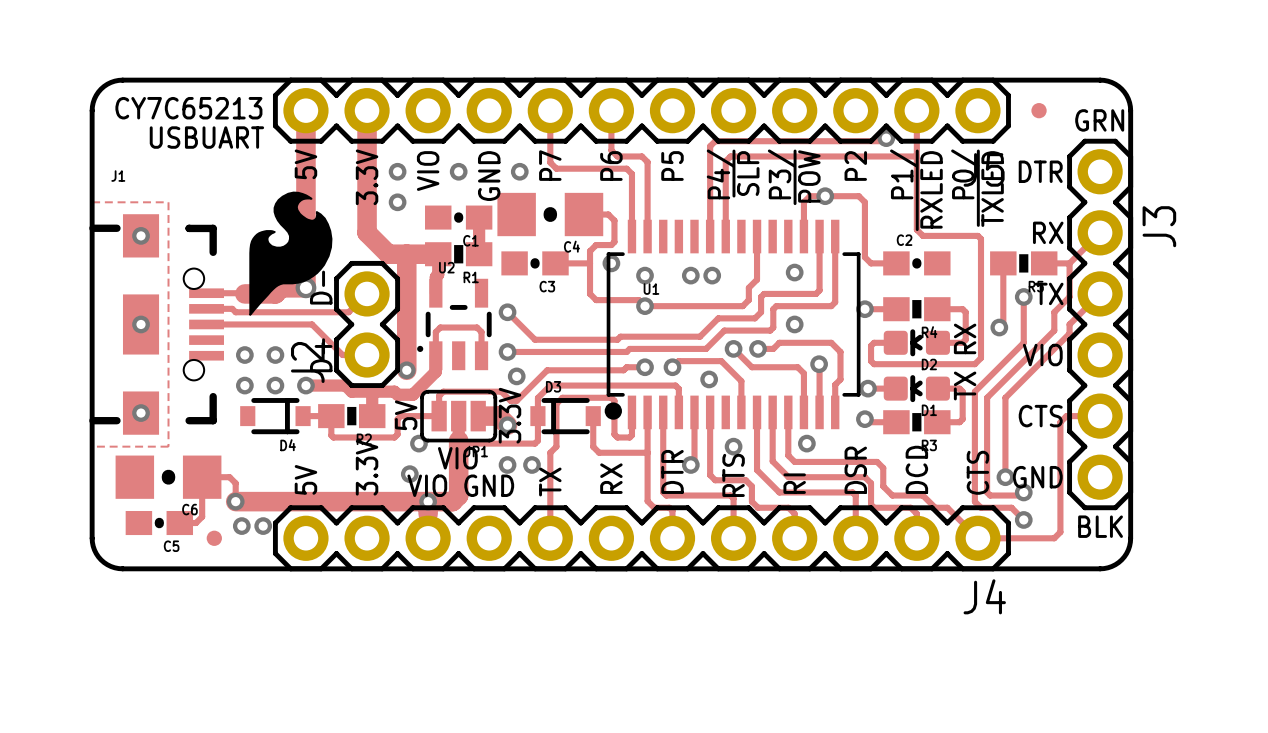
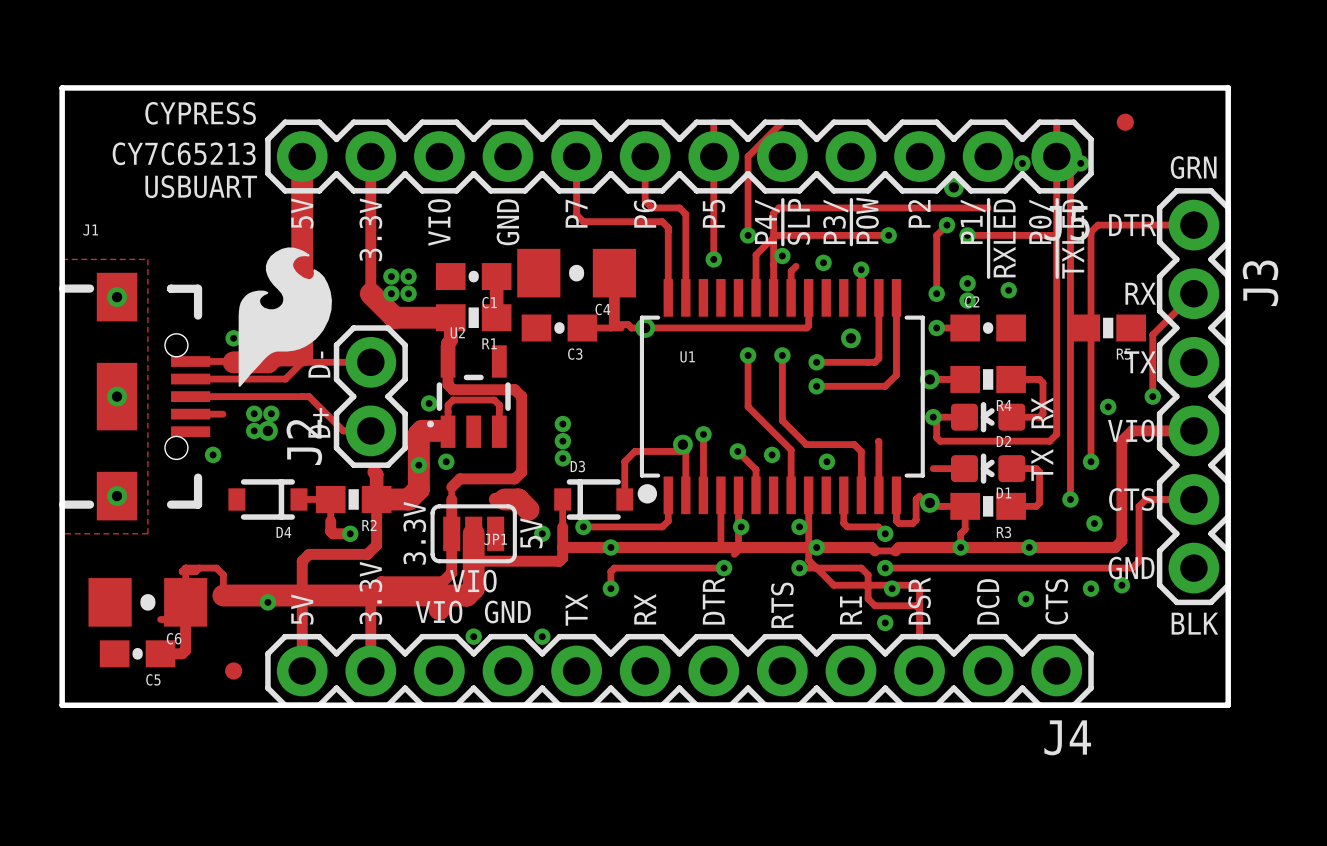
text: none -> CYPRESS (200, 113)
track: none -> (713, 122) (713, 259)
track: none -> (782, 122) (748, 156) (748, 235)
board edge: (92, 110) (94, 98) (101, 89) (111, 82) (122, 80) (1100, 80) (1111, 82) (1121, 89) (1128, 98) (1130, 110) -> (62, 156) (62, 87) (1228, 87) (1228, 156)
track width: thick (367, 110) (367, 232) -> thin (370, 156) (370, 293)
track: (916, 110) (916, 229) (922, 235) (977, 235) (981, 238) (981, 358) (974, 364) (971, 364) -> (1056, 122) (1056, 434) (1049, 441)
part position: (1039, 110) -> (1125, 122)
via: none -> (1022, 163)
track: none -> (1080, 163) (1070, 173) (1070, 499)
via: none -> (1080, 163)
track: (886, 138) (883, 141) (715, 141) (710, 146) (710, 198) -> (888, 235) (775, 235) (756, 254)
via: (397, 171) -> none
via: (458, 171) -> none
via: (519, 171) -> none
track: none -> (946, 225) (936, 235) (936, 293)
via: none -> (946, 225)
track: none -> (1193, 225) (1097, 225) (1091, 231) (1091, 461)
via: none -> (748, 235)
track: none -> (967, 235) (1056, 235)
via: none -> (967, 235)
via position: (825, 196) -> (888, 235)
via: none -> (782, 255)
via: (397, 202) -> none
via: none -> (713, 259)
via: none -> (823, 262)
track: none -> (796, 266) (791, 271) (791, 297)
track: (803, 208) (803, 202) (809, 196) (858, 196) (864, 202) (864, 257) (871, 263) -> none
via: none -> (861, 269)
track: (583, 214) (608, 214) (614, 220) (614, 242) (611, 245) (596, 245) (590, 251) (590, 293) (596, 300) (638, 300) (645, 306) (742, 306) (748, 300) (748, 287) (757, 279) (757, 261) -> (614, 273) (614, 324) (628, 324) (631, 328) (806, 328) (808, 325)
via: none -> (391, 276)
via: none -> (408, 276)
via: none -> (967, 283)
via: none -> (1008, 290)
via: none -> (391, 293)
via: none -> (408, 293)
via: none -> (936, 293)
via: none -> (967, 300)
track: (406, 254) (406, 370) -> none
via: none -> (936, 328)
track: (1003, 263) (1003, 323) (999, 327) -> none
track: (1044, 263) (1069, 263) (1069, 296) (1054, 312) (1054, 330) (987, 397) (987, 492) (990, 495) (1020, 495) (1023, 492) -> none
track: none -> (1159, 328) (1152, 334) (1152, 396)
via: none -> (233, 338)
via: (645, 275) -> none
via: (690, 275) -> none
via: (712, 275) -> none
via: (305, 287) -> none
via: none -> (748, 355)
via: none -> (782, 355)
track: (367, 293) (348, 312) (235, 312) (232, 308) -> (370, 362) (302, 362) (285, 379) (219, 379)
track: (764, 293) (761, 296) (761, 312) (754, 318) (718, 318) (699, 336) (620, 336) (617, 339) (535, 339) (507, 312) -> none
via: none -> (816, 362)
track: (1100, 293) (1069, 324) (1069, 333) (1005, 397) (1005, 477) -> none
track: (1023, 296) (1023, 342) (974, 391) (974, 501) (981, 507) (1011, 507) (1023, 519) -> none
via: (1023, 296) -> none
track: (835, 302) (831, 306) (776, 306) (773, 309) (773, 327) (770, 330) (724, 330) (706, 348) (629, 348) (626, 351) (507, 351) -> (896, 371) (896, 375) (885, 386) (816, 386)
via: (645, 306) -> none
via: (507, 312) -> none
via: none -> (816, 386)
via: (794, 324) -> none
via: none -> (1152, 396)
via: (999, 327) -> none
via: none -> (429, 403)
via: none -> (1108, 406)
via: none -> (254, 413)
via: none -> (271, 413)
track: none -> (190, 414) (222, 414)
via: none -> (933, 417)
via: none -> (562, 424)
track: (733, 348) (751, 367) (754, 367) -> (782, 355) (782, 420) (806, 444)
via: (733, 348) -> none
track: (758, 348) (773, 348) (779, 342) (831, 342) (840, 351) (840, 379) (835, 384) (835, 412) -> (919, 496) (916, 499) (916, 520) (912, 523) (898, 523) (896, 520) (896, 495)
via: (758, 348) -> none
via: (507, 351) -> none
via: (244, 355) -> none
via: none -> (254, 430)
track: (435, 355) (435, 371) (412, 394) (397, 394) (394, 391) (351, 391) (345, 385) (305, 385) -> (448, 431) (422, 430) (418, 434) (418, 489) (408, 499) (376, 499) (376, 545) (367, 554) (309, 554) (302, 561) (302, 670)
track: none -> (1193, 430) (1132, 430) (1121, 441) (1121, 540) (1115, 547) (898, 547) (895, 550)
via: none -> (562, 441)
via: (819, 364) -> none
track: (645, 367) (626, 367) (623, 370) (547, 370) (516, 400) (510, 400) (501, 391) (443, 391) (439, 395) (439, 405) -> (448, 361) (448, 384) (453, 389) (514, 389) (521, 396) (521, 472) (514, 478) (460, 478) (451, 487)
track: (672, 367) (678, 361) (721, 361) (741, 381) -> (748, 355) (748, 406) (791, 449) (791, 460)
via position: (672, 367) -> (703, 434)
via position: (406, 370) -> (418, 465)
via: none -> (737, 451)
via: none -> (213, 454)
via: (516, 376) -> none
via: none -> (772, 454)
via: none -> (562, 458)
via: (709, 379) -> none
via: none -> (446, 461)
via: none -> (826, 461)
via: none -> (1091, 461)
via: (244, 385) -> none
via: (275, 385) -> none
via: (305, 385) -> none
via: (867, 388) -> none
track: (647, 412) (647, 501) (654, 507) (669, 507) (672, 510) (672, 538) -> none
track: (663, 412) (663, 492) (666, 495) (730, 495) (733, 498) (733, 538) -> (703, 495) (703, 434)
track: (678, 412) (678, 388) (675, 385) (550, 385) (537, 397) (537, 416) -> (720, 495) (720, 547)
track: (710, 412) (710, 475) (715, 480) (745, 480) (751, 486) (751, 501) (758, 507) (788, 507) (794, 513) (794, 538) -> (756, 495) (756, 469) (737, 451)
track: (772, 412) (772, 461) (788, 477) -> (799, 568) (844, 568)
text: 5V (406, 415) -> none
text: 3.3V (510, 415) -> none
track: (439, 416) (400, 416) (397, 419) (397, 434) (394, 437) (333, 437) (331, 435) -> (350, 533) (333, 533) (330, 531) (330, 521)
track: none -> (451, 499) (451, 572) (442, 581) (381, 581) (370, 592) (370, 670)
track: (458, 416) (458, 446) (461, 443) (535, 443) (537, 440) -> (473, 561) (559, 561) (562, 557) (562, 527)
JP1 position: (458, 416) -> (473, 533)
track: (593, 416) (593, 446) (599, 452) (647, 452) -> (624, 499) (624, 461) (634, 451) (686, 451) (685, 495)
via: none -> (1070, 499)
track: (1066, 416) (1060, 422) (1060, 532) (1054, 538) (977, 538) (947, 507) (935, 507) (922, 495) (892, 495) (883, 486) (883, 468) (877, 461) (834, 461) -> (1156, 499) (1145, 499) (1139, 506) (1139, 561) (1132, 568) (929, 568)
track: none -> (965, 506) (965, 529) (960, 533) (960, 547)
via: (507, 425) -> none
track: (629, 437) (617, 437) (614, 434) (614, 400) (611, 397) (562, 397) (556, 403) (556, 446) (550, 452) (550, 538) -> (665, 523) (662, 526) (583, 526)
track: (788, 437) (788, 455) (794, 461) (816, 461) -> (843, 523) (847, 526) (878, 526) (885, 533)
via: none -> (1094, 523)
via: none -> (583, 526)
via: none -> (741, 526)
via: (418, 443) -> none
via: (806, 443) -> none
text: none -> 5V (531, 533)
via: none -> (350, 533)
text: none -> 3.3V (414, 533)
via: none -> (542, 533)
via position: (733, 446) -> (799, 526)
via: none -> (885, 533)
text: VIO (457, 458) -> none
track: none -> (562, 547) (871, 547) (874, 550)
via: none -> (610, 547)
via: none -> (816, 547)
via: none -> (960, 547)
via: none -> (1029, 547)
via: (507, 464) -> none
via: (531, 464) -> none
via position: (690, 464) -> (724, 568)
text position: 3.3V (367, 467) -> 3.3V (370, 593)
text position: DCD (916, 469) -> DCD (988, 601)
text position: DSR (855, 470) -> DSR (919, 601)
text position: DTR (672, 471) -> DTR (713, 601)
text position: CTS (977, 472) -> CTS (1056, 601)
via: (409, 474) -> none
text position: RTS (733, 475) -> RTS (782, 605)
C6 position: (168, 477) -> (147, 602)
track: none -> (724, 568) (614, 568) (610, 571) (610, 588)
via: none -> (799, 568)
track: (803, 477) (825, 477) -> (861, 568) (868, 574) (868, 598) (874, 605) (916, 605) (919, 609)
via: none -> (885, 568)
track: (864, 477) (871, 483) (871, 504) (874, 507) (910, 507) (916, 513) (916, 538) -> none
via: (1005, 477) -> none
text position: RX (611, 478) -> RX (645, 609)
text position: 5V (305, 479) -> 5V (302, 609)
text position: TX (550, 481) -> TX (576, 609)
text position: RI (794, 483) -> RI (850, 610)
text: VIO (427, 485) -> none
text position: GND (489, 485) -> GND (507, 611)
text: none -> VIO (473, 581)
via: (1023, 492) -> none
via: none -> (1121, 585)
via: none -> (610, 588)
via: none -> (892, 588)
via: none -> (1091, 588)
via: (235, 501) -> none
via: (428, 501) -> none
via: none -> (1025, 598)
track: none -> (185, 602) (185, 650) (182, 653) (160, 653)
via: none -> (267, 602)
text: none -> VIO (439, 611)
via: (1023, 519) -> none
C5 position: (159, 523) -> (137, 653)
via: (241, 526) -> none
via: (263, 526) -> none
via: none -> (885, 622)
board edge: (92, 538) (94, 549) (101, 559) (111, 566) (122, 568) (1100, 568) (1111, 566) (1121, 559) (1128, 549) (1130, 538) -> (62, 636) (62, 705) (1228, 705) (1228, 636)
part position: (214, 538) -> (233, 670)
via: none -> (473, 636)
via: none -> (542, 636)
J4 position: (641, 538) -> (679, 670)

